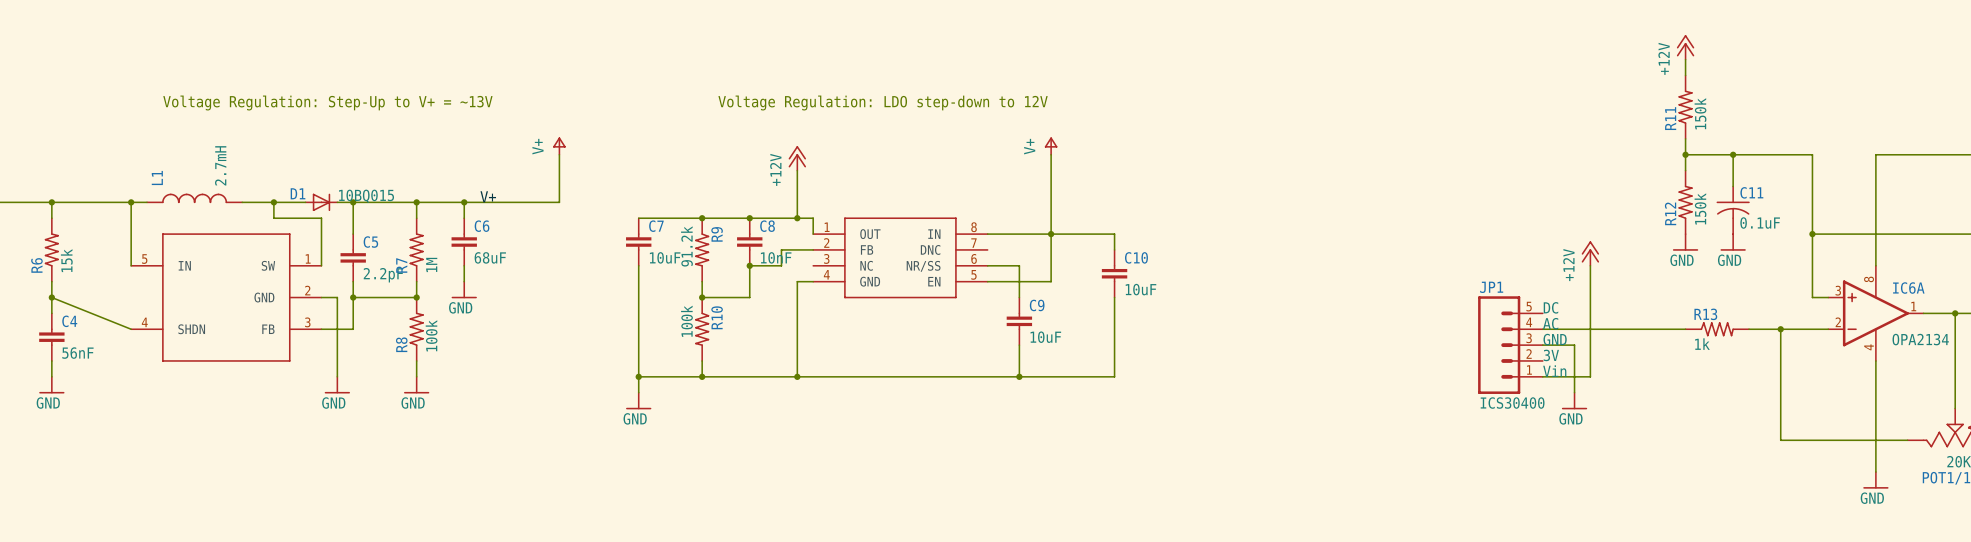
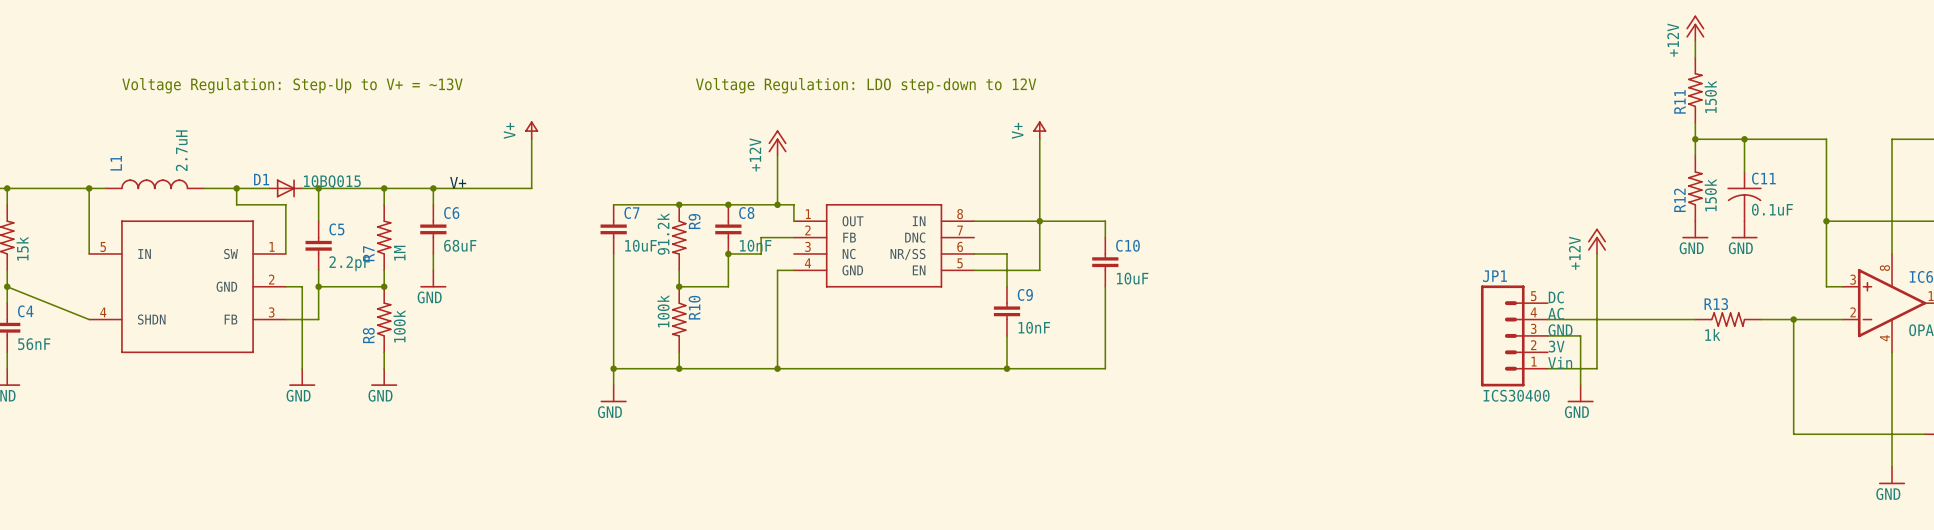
L1 value: 2.7mH (220, 165) -> 2.7uH (181, 150)
C9 value: 10uF (1045, 337) -> 10nF (1034, 327)

